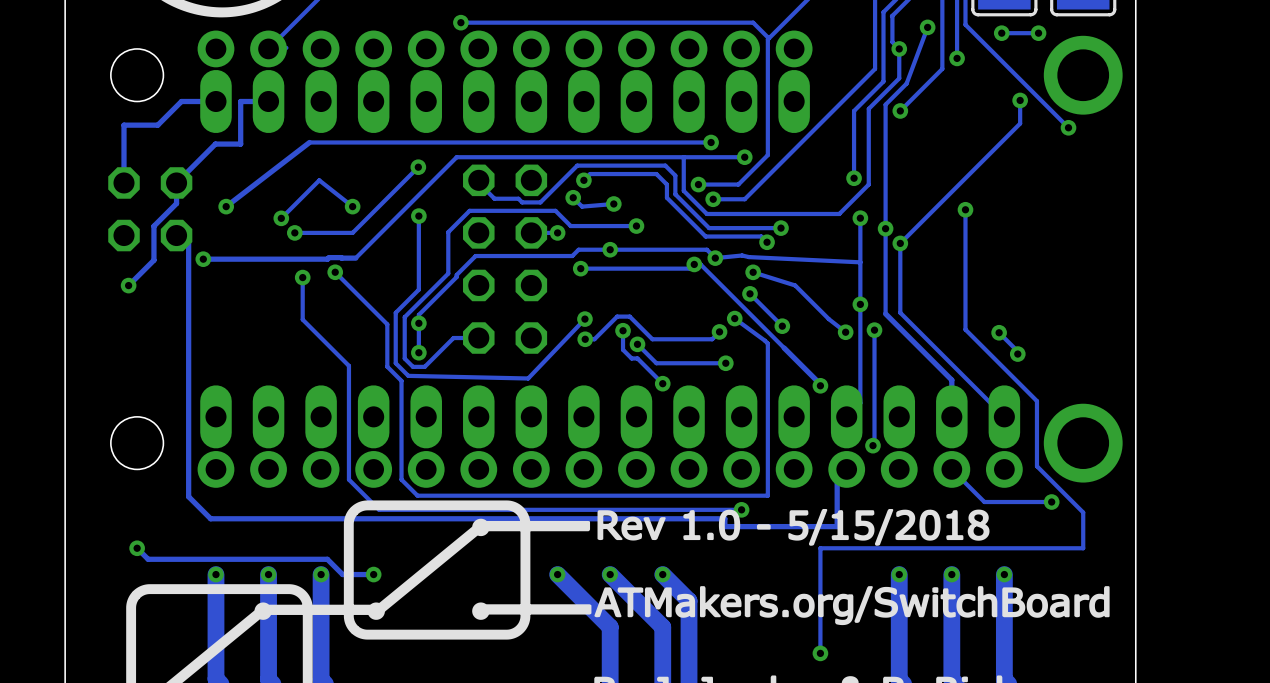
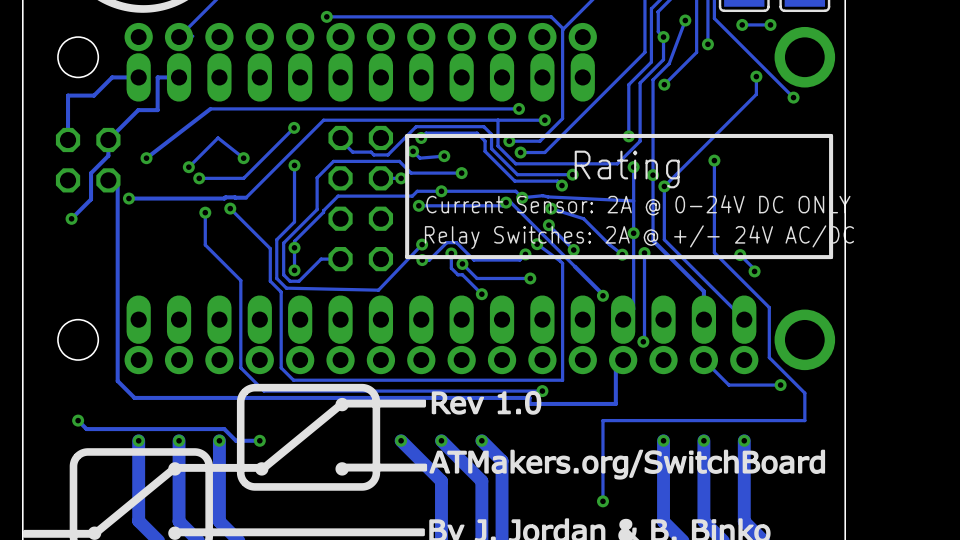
line: none -> (831, 135) (407, 135) (407, 257) (831, 257) (831, 135)
text: none -> Rating (627, 169)
text: none -> Current Sensor: 2A @ 0-24V DC ONLY (638, 205)
text: none -> Relay Switches: 2A @ +/- 24V AC/DC (639, 237)
drawing: [756, 508, 990, 546] -> none

